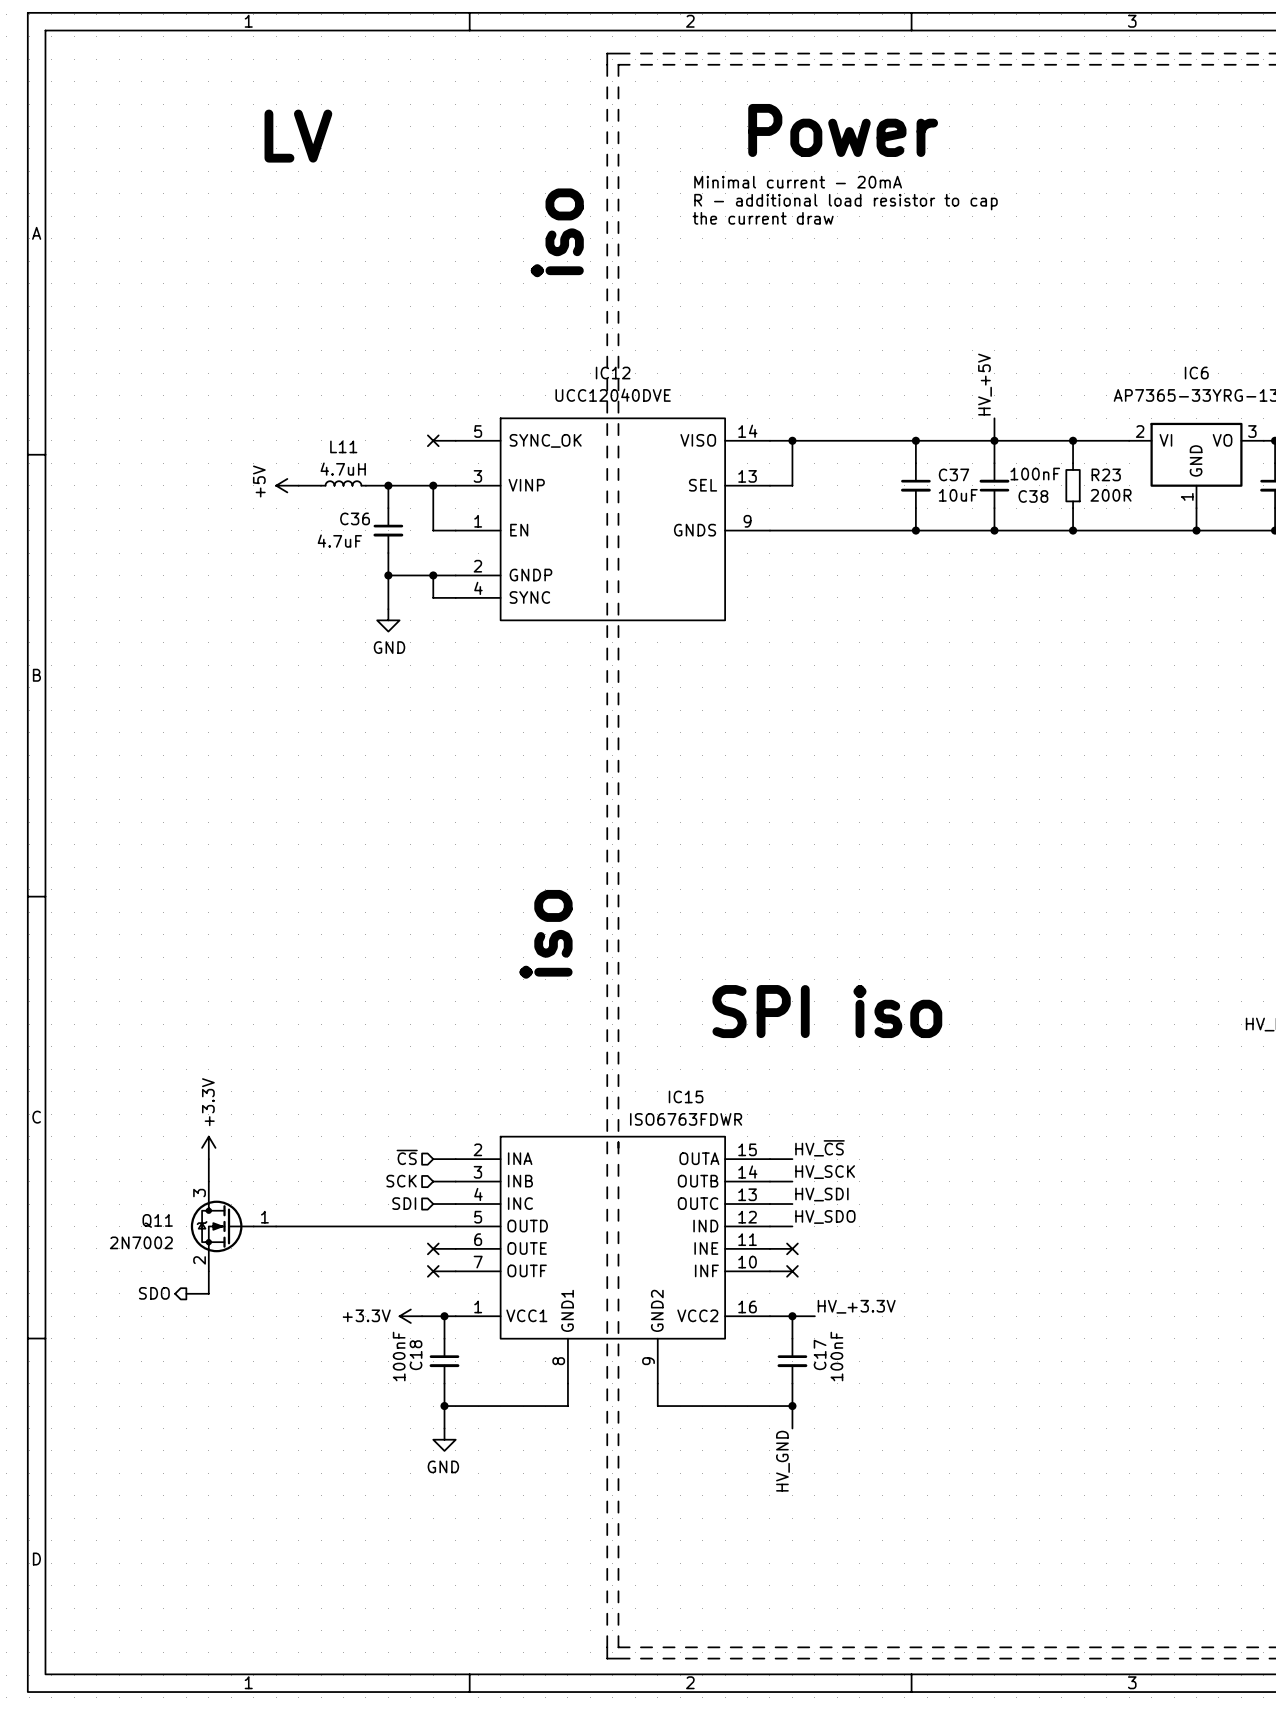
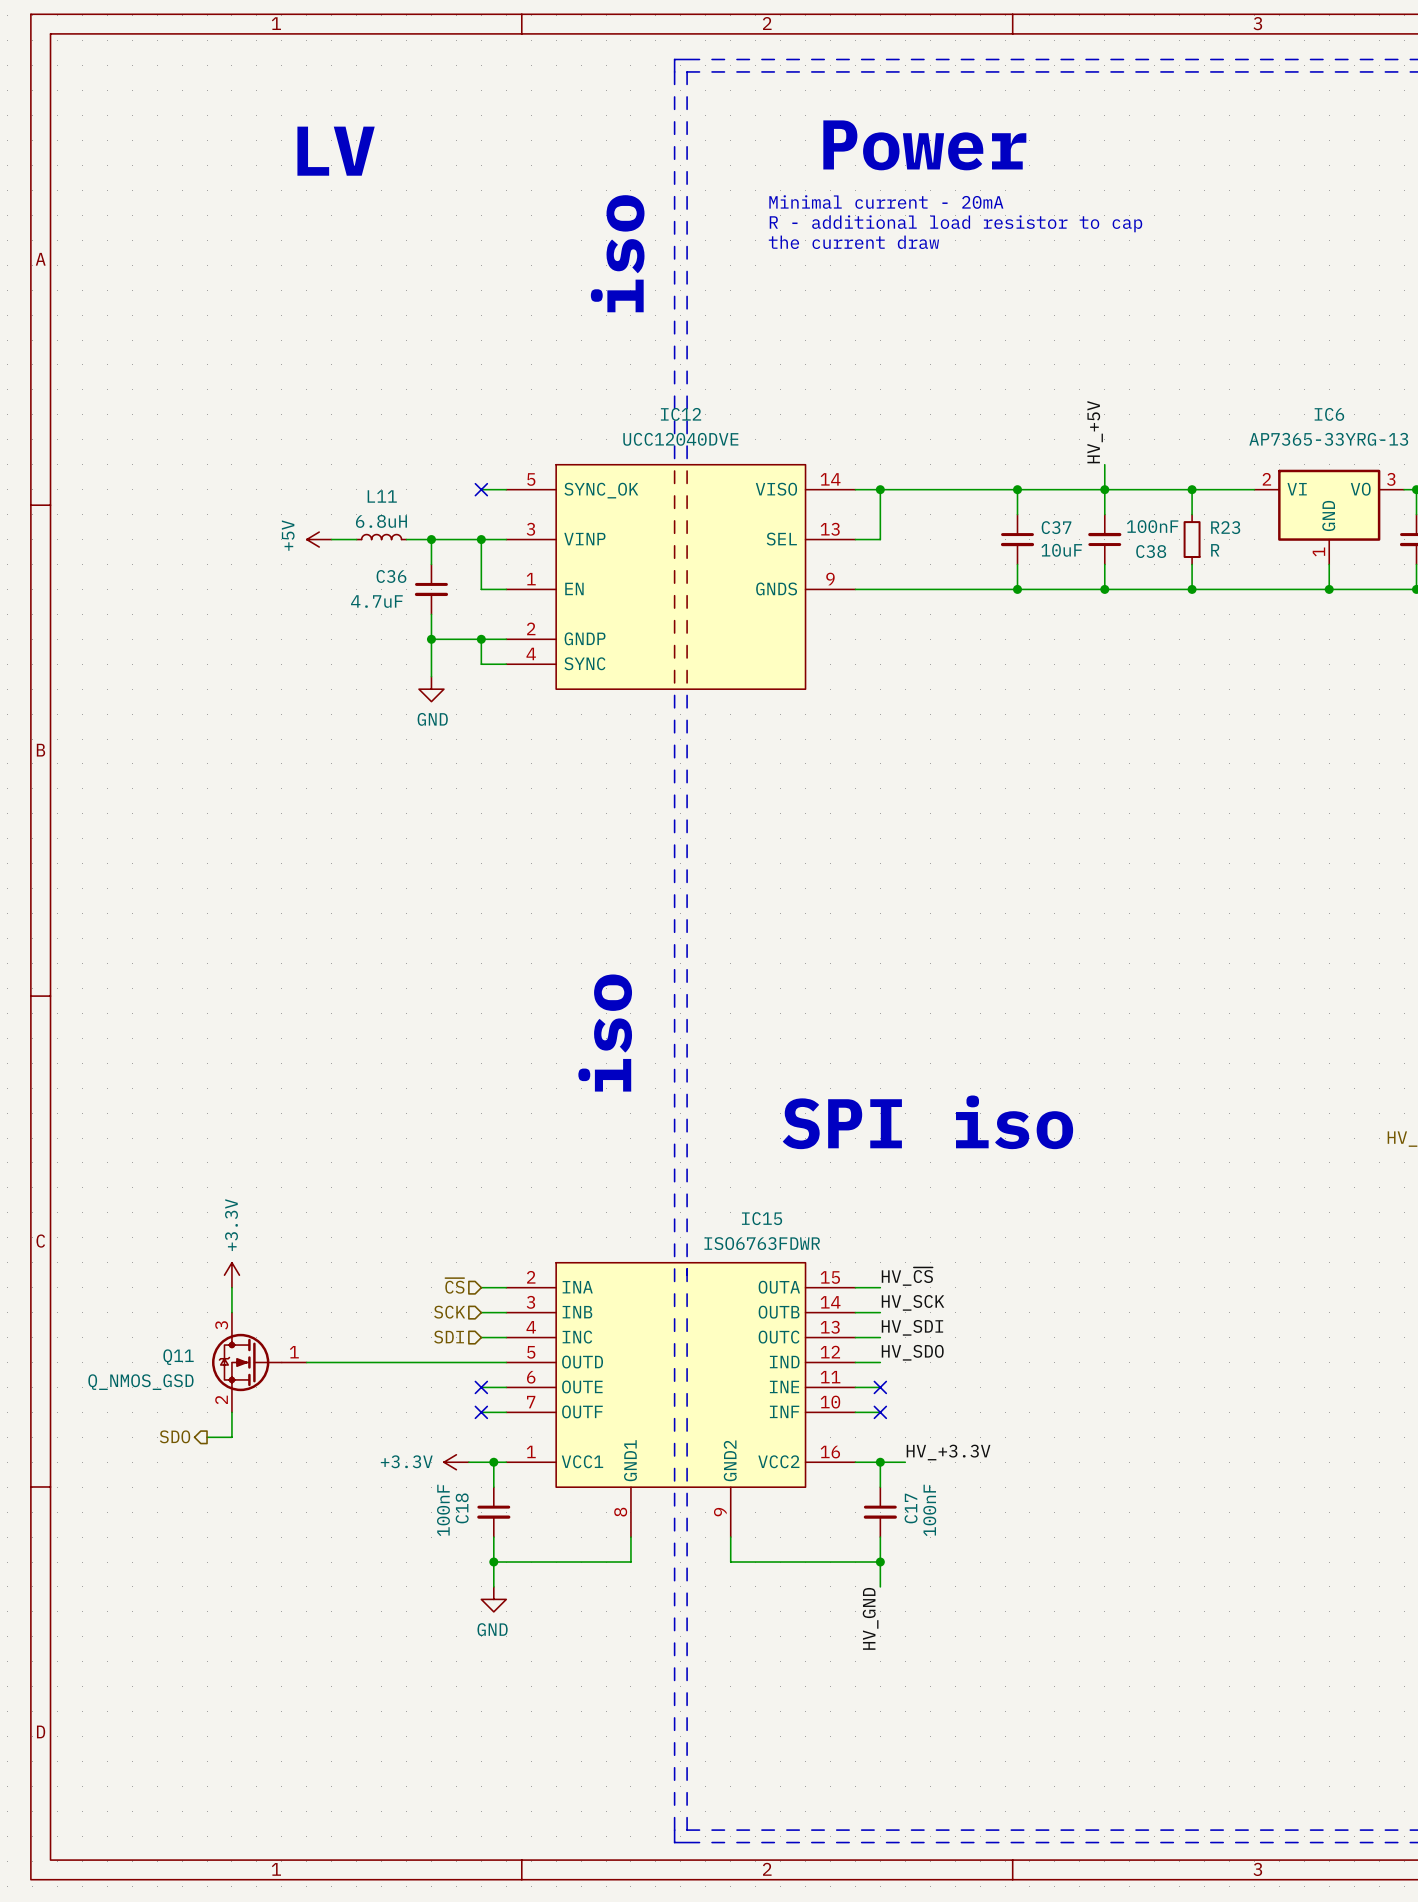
L11 value: 4.7uH (343, 469) -> 6.8uH (381, 521)
R23 value: 200R (1111, 495) -> R (1215, 550)
Q11 value: 2N7002 (141, 1242) -> Q_NMOS_GSD (140, 1382)

